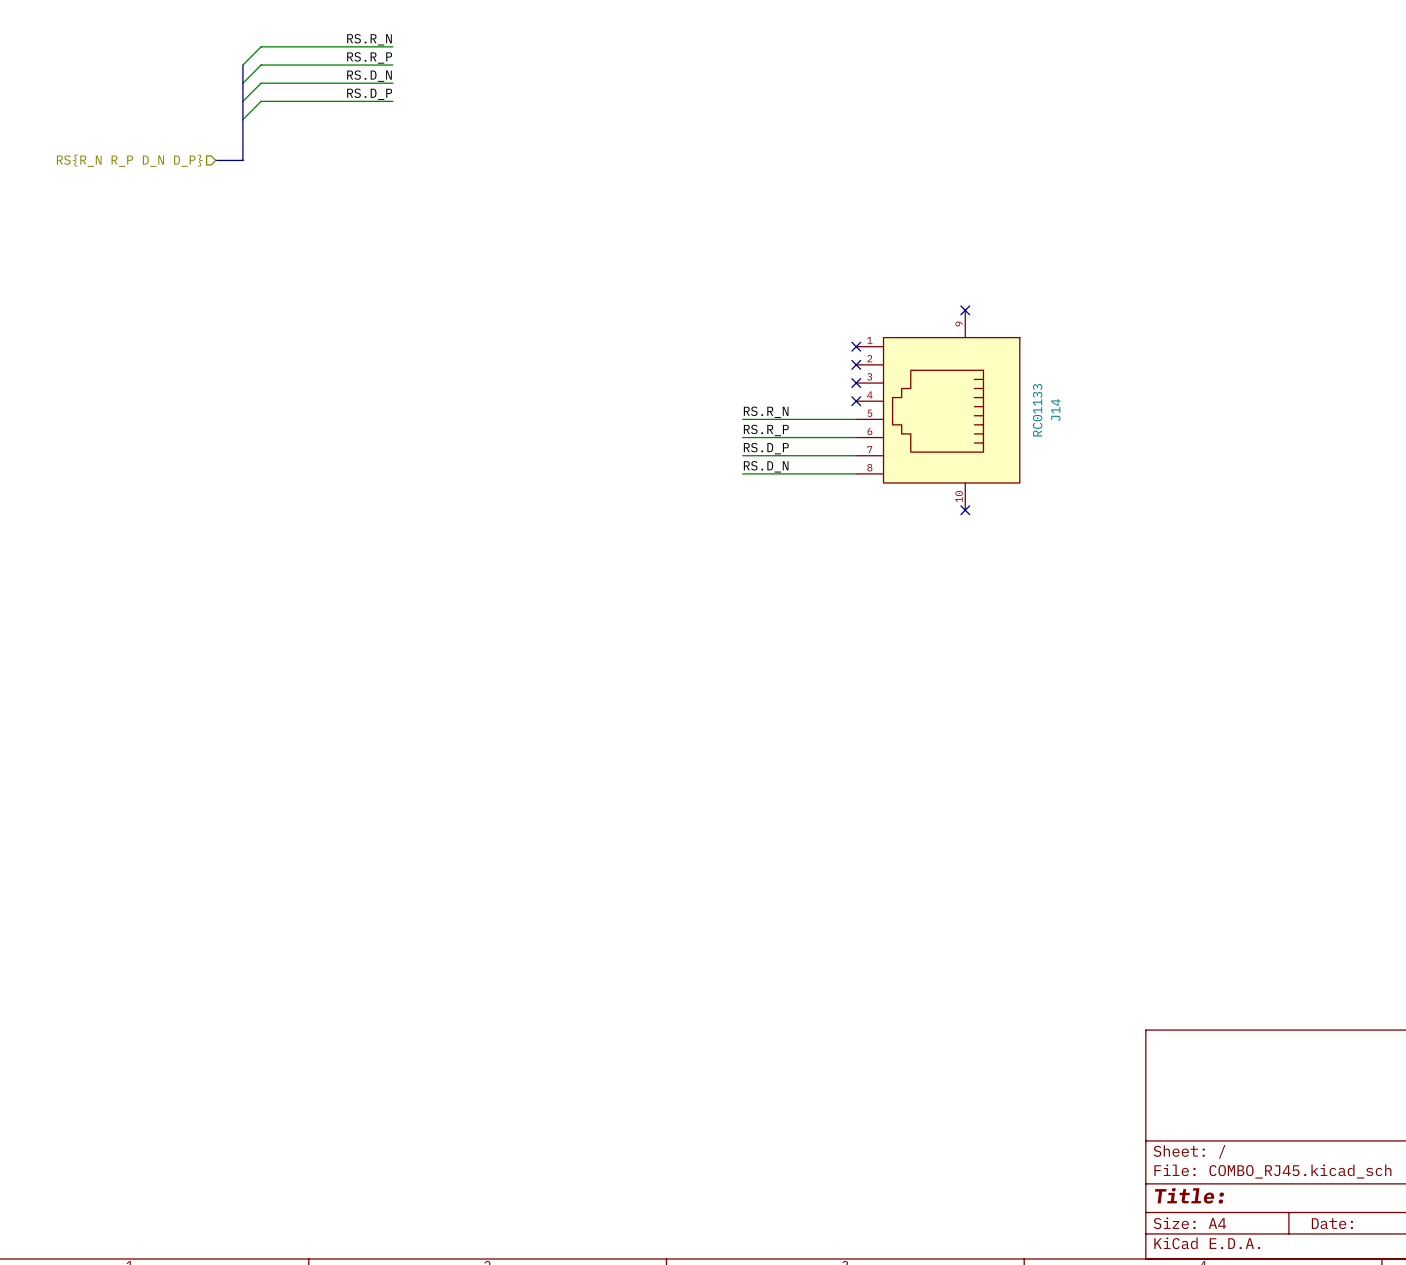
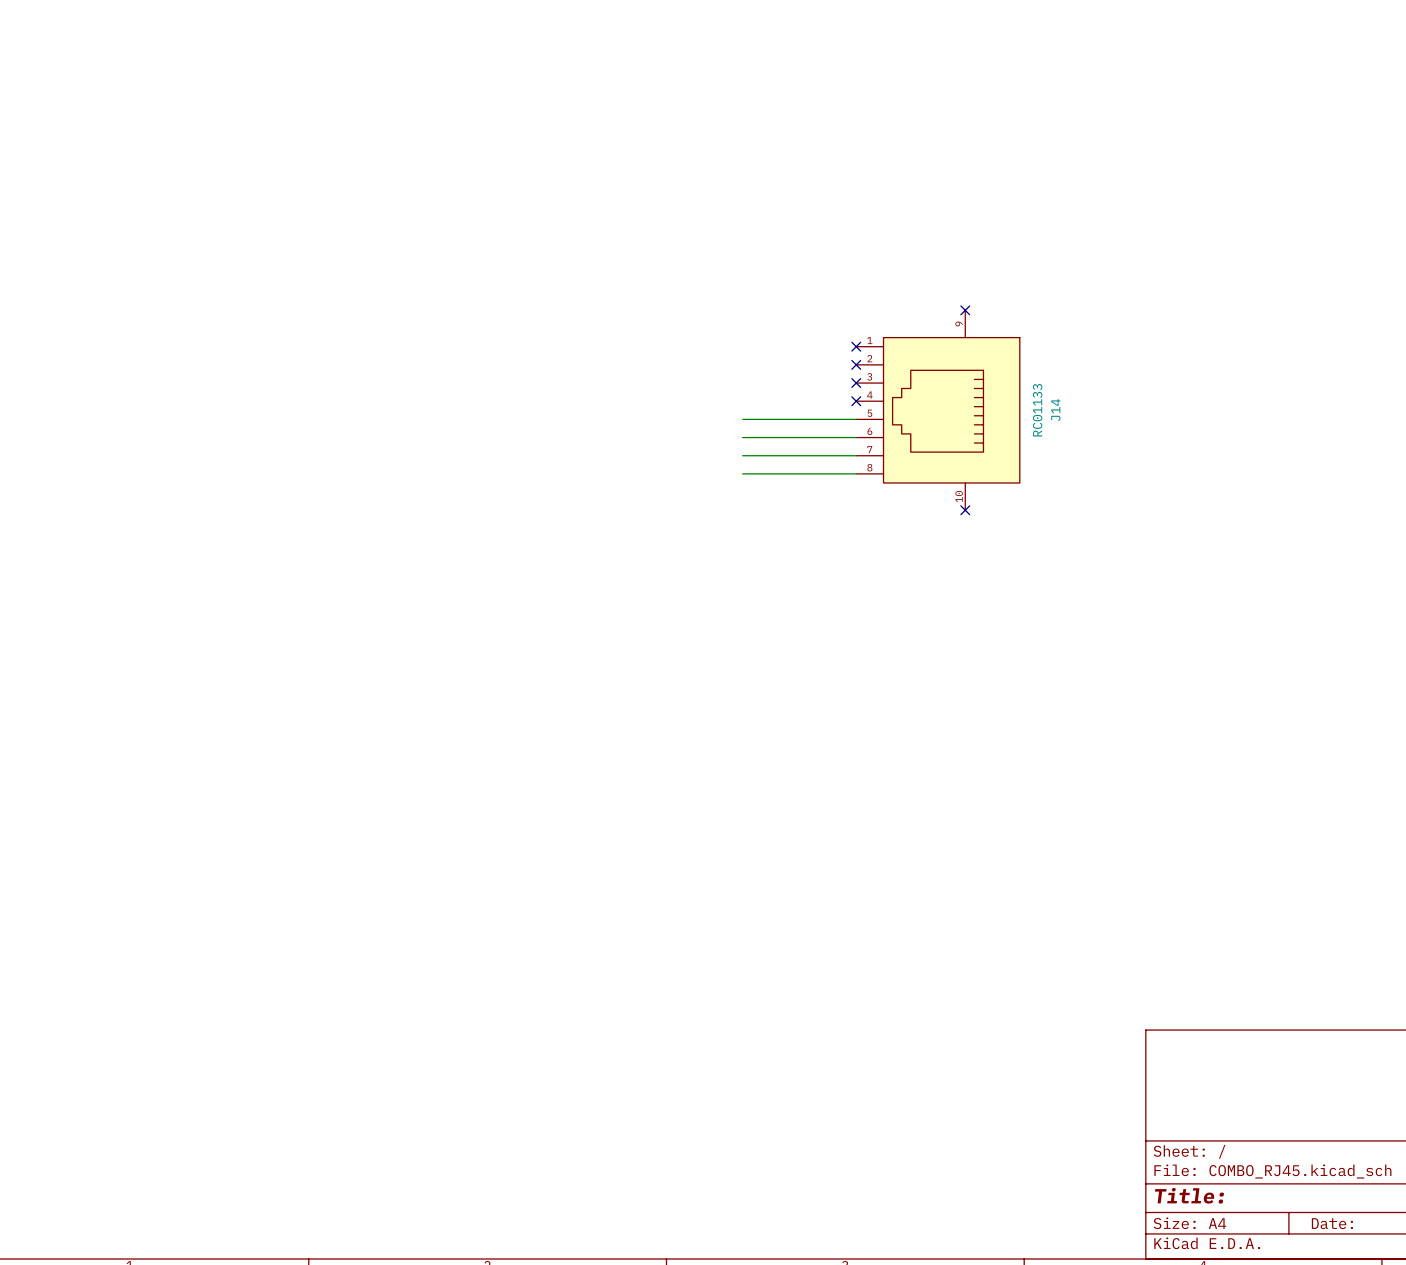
label: RS.R_N (369, 39) -> none
wire: (392, 46) (261, 46) (242, 65) -> none
label: RS.R_P (369, 57) -> none
bus: (242, 65) (242, 160) (215, 160) -> none
wire: (261, 65) (392, 65) -> none
wire: (261, 65) (242, 83) -> none
label: RS.D_N (369, 76) -> none
wire: (392, 83) (261, 83) (242, 101) -> none
label: RS.D_P (369, 94) -> none
wire: (392, 101) (261, 101) (242, 119) -> none
hierarchical label: RS{R_N R_P D_N D_P} (129, 160) -> none
label: RS.R_N (766, 412) -> none
label: RS.R_P (766, 430) -> none
label: RS.D_P (766, 448) -> none
label: RS.D_N (766, 466) -> none

